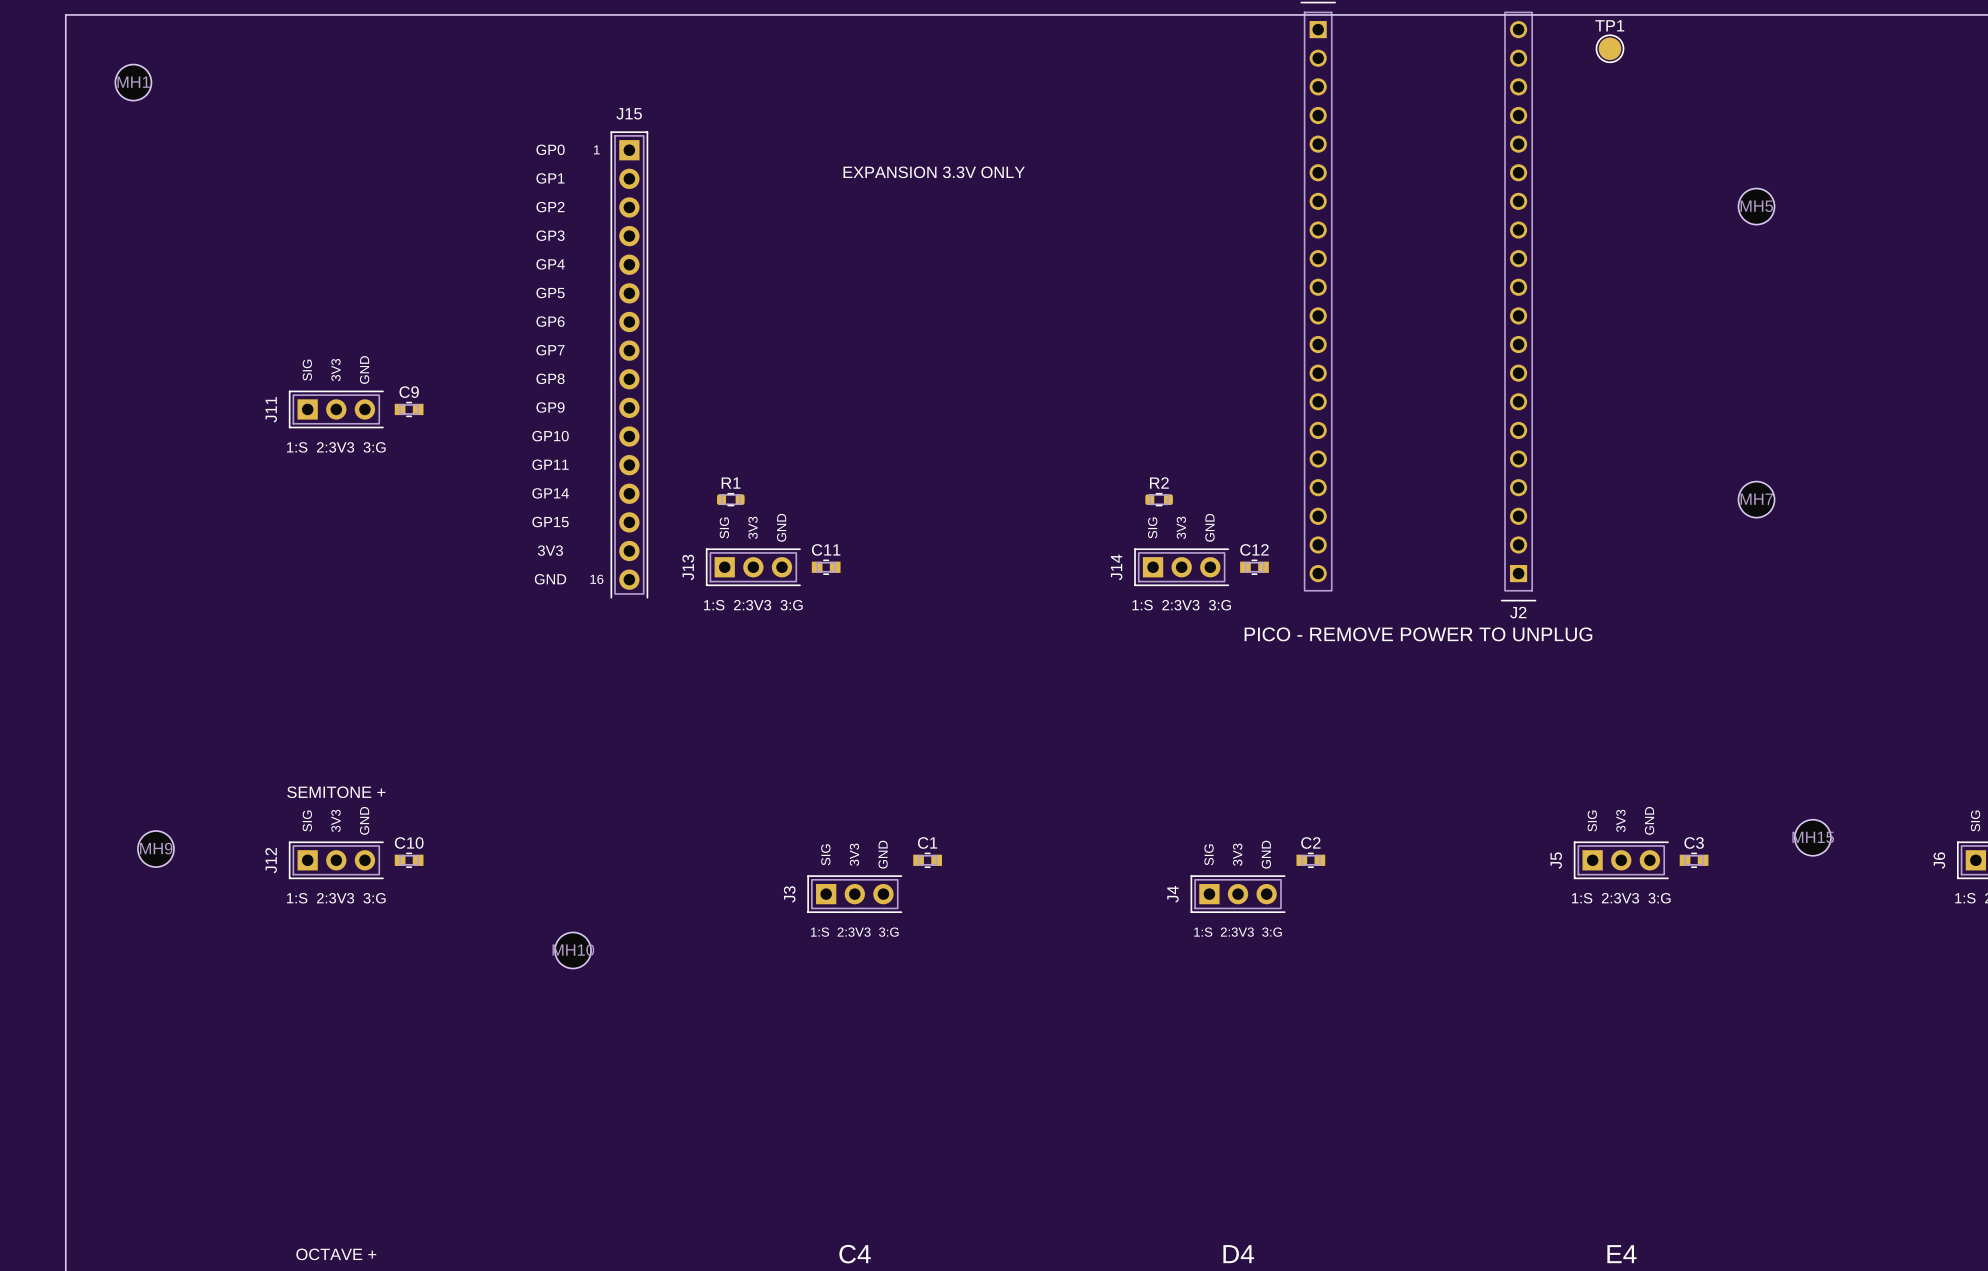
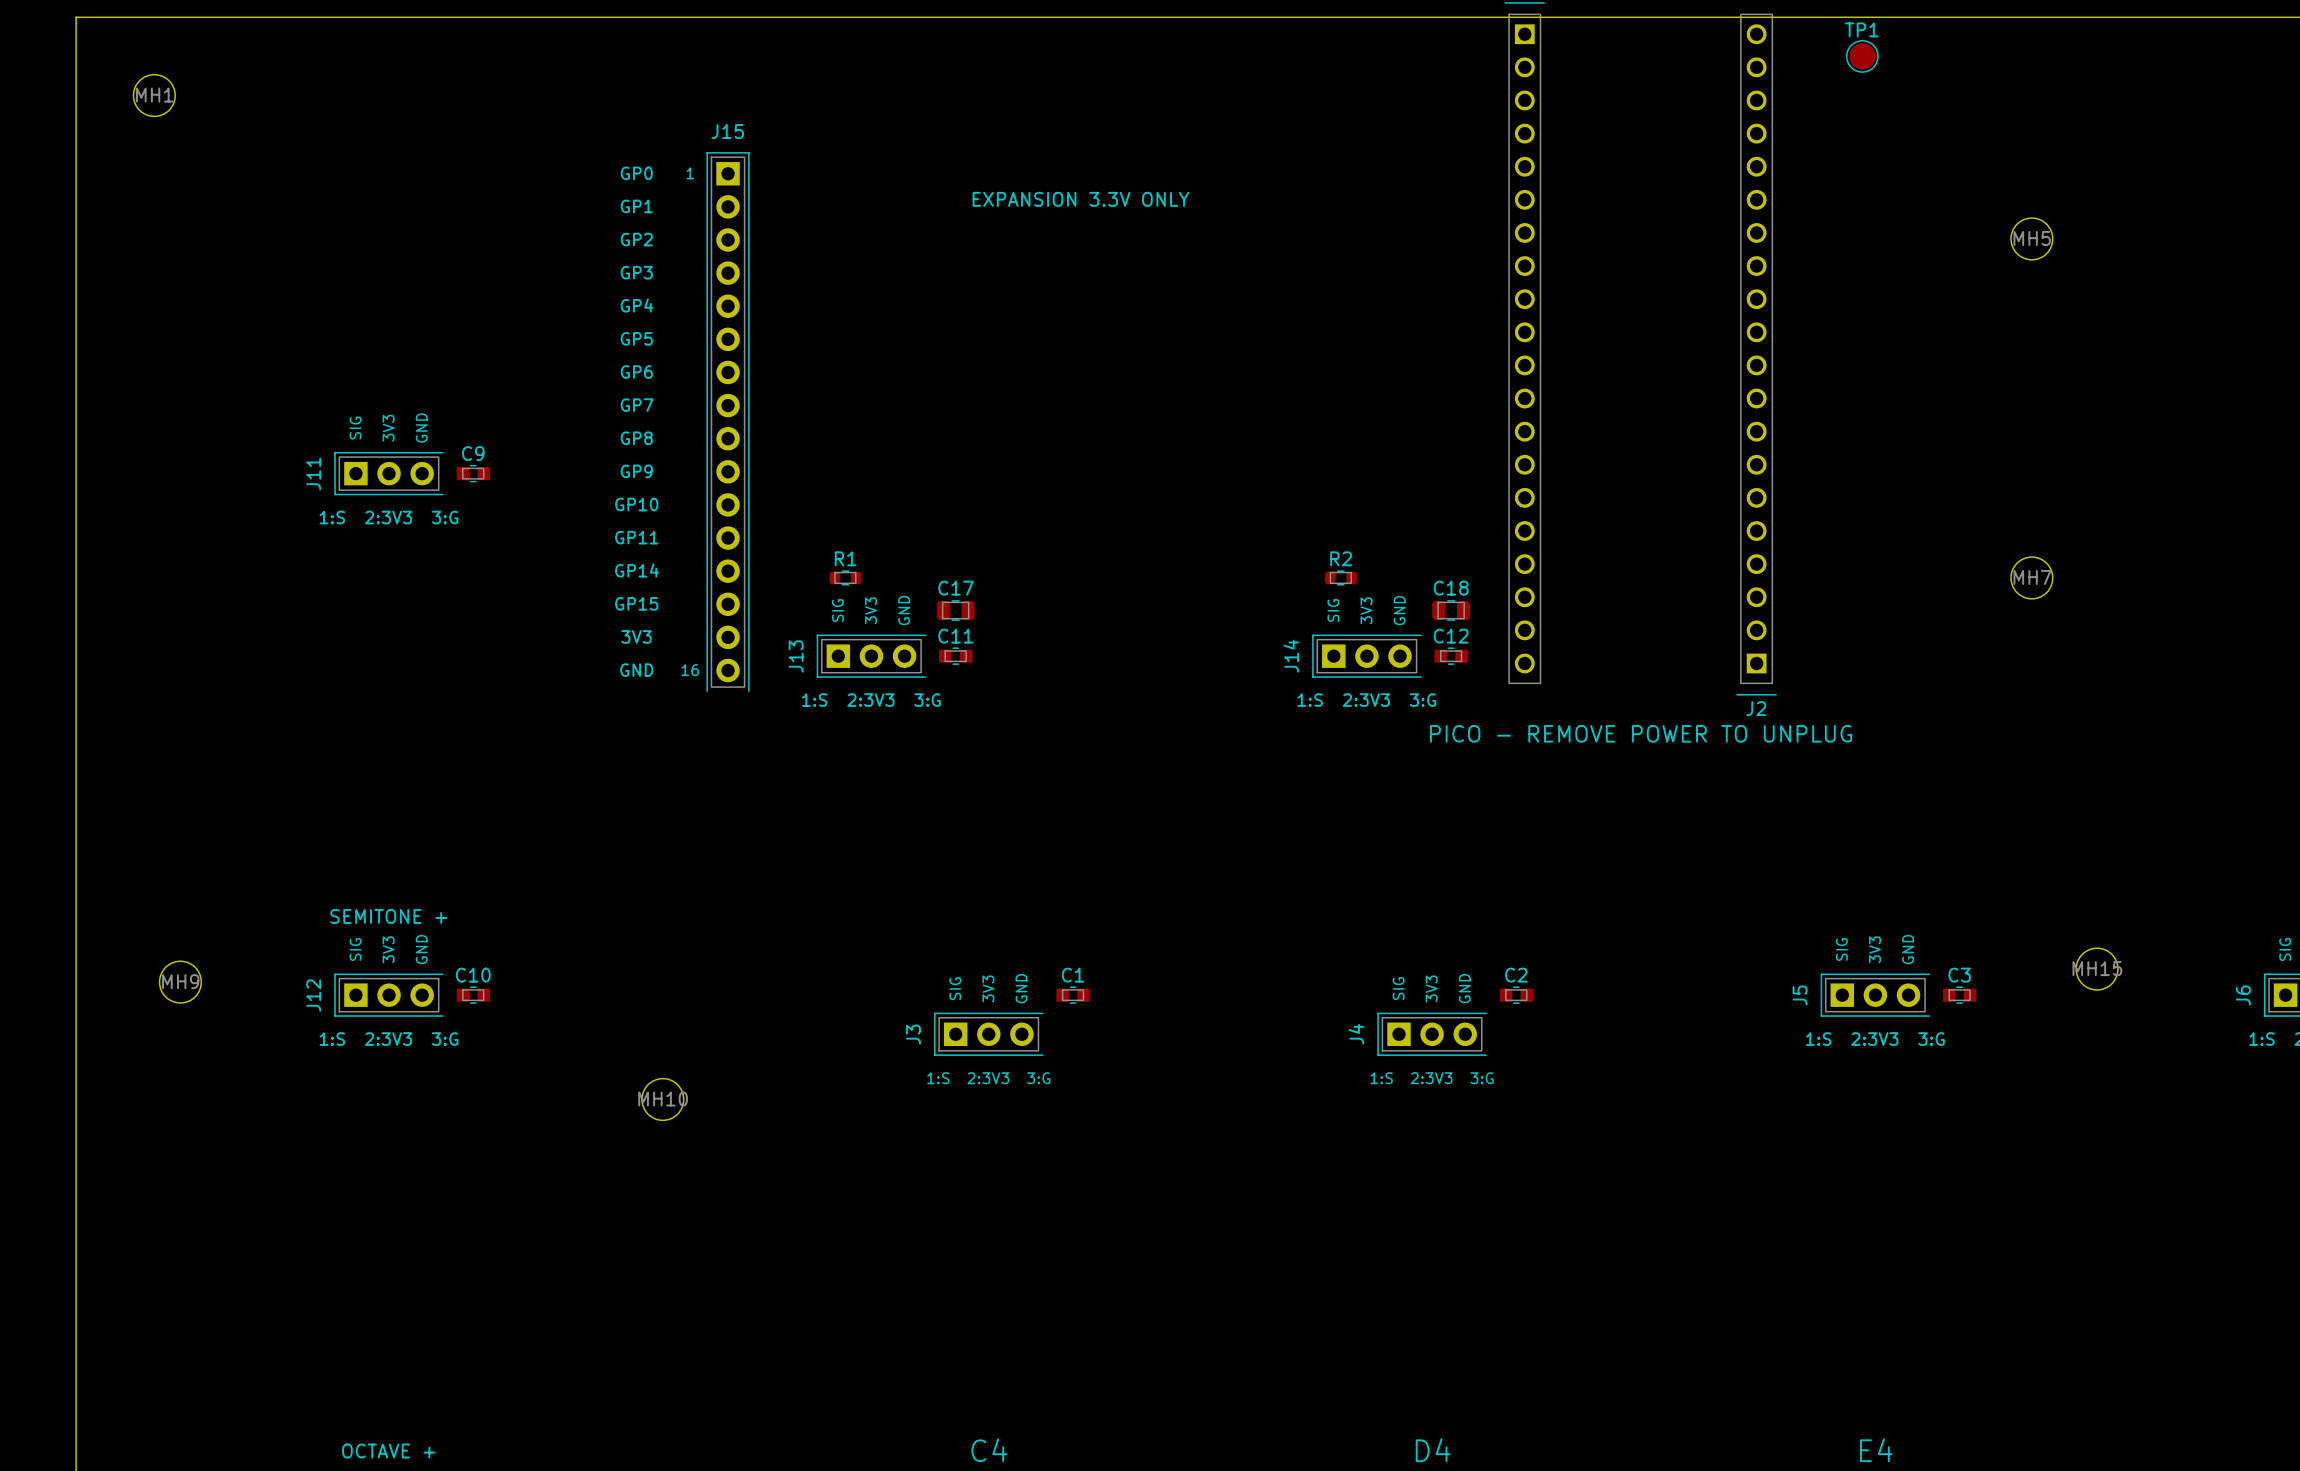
C17: none -> (955, 610)
C18: none -> (1451, 610)

